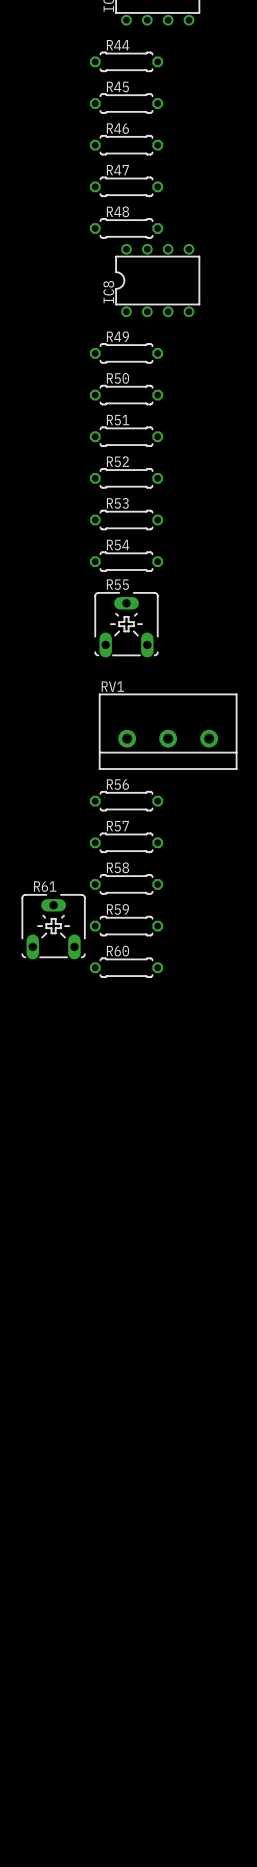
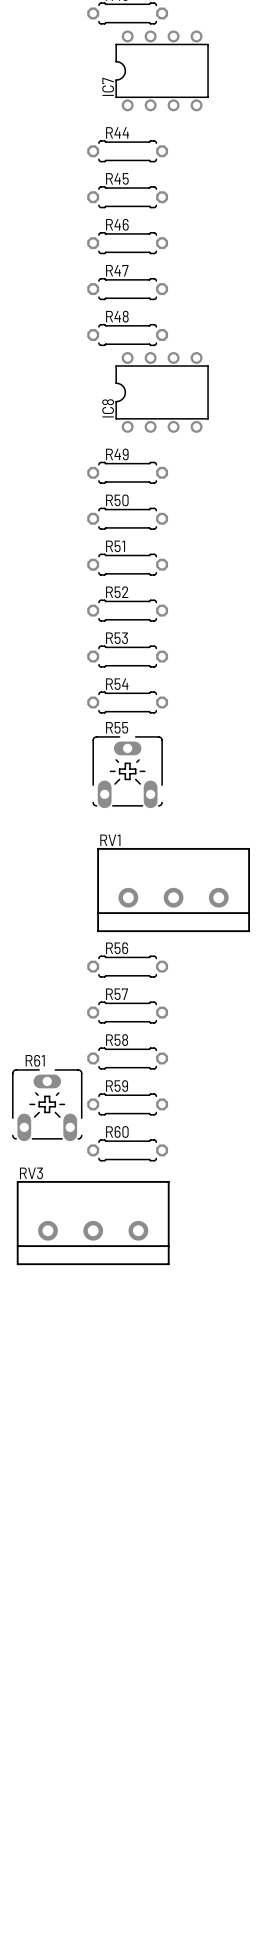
RV3: none -> (93, 1223)

